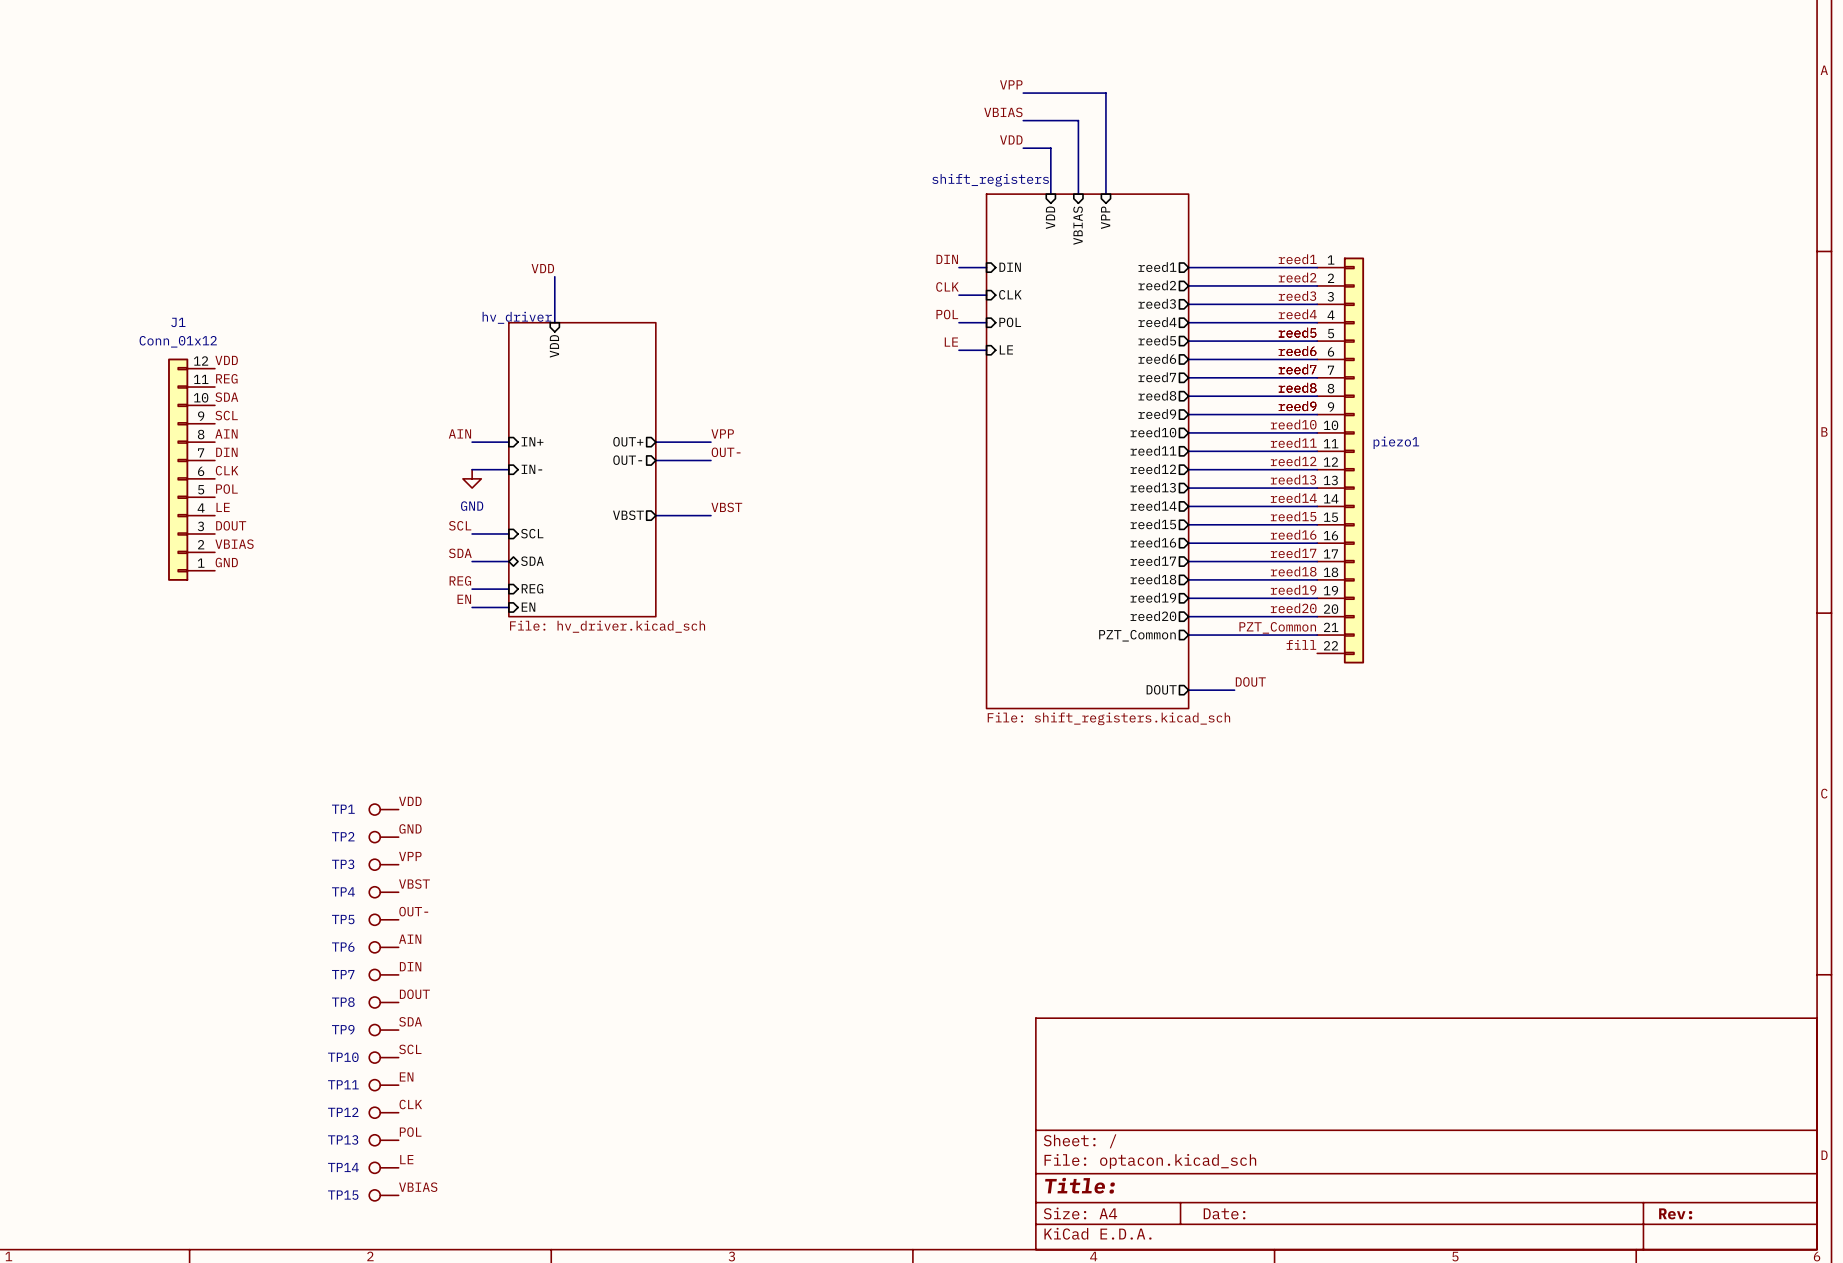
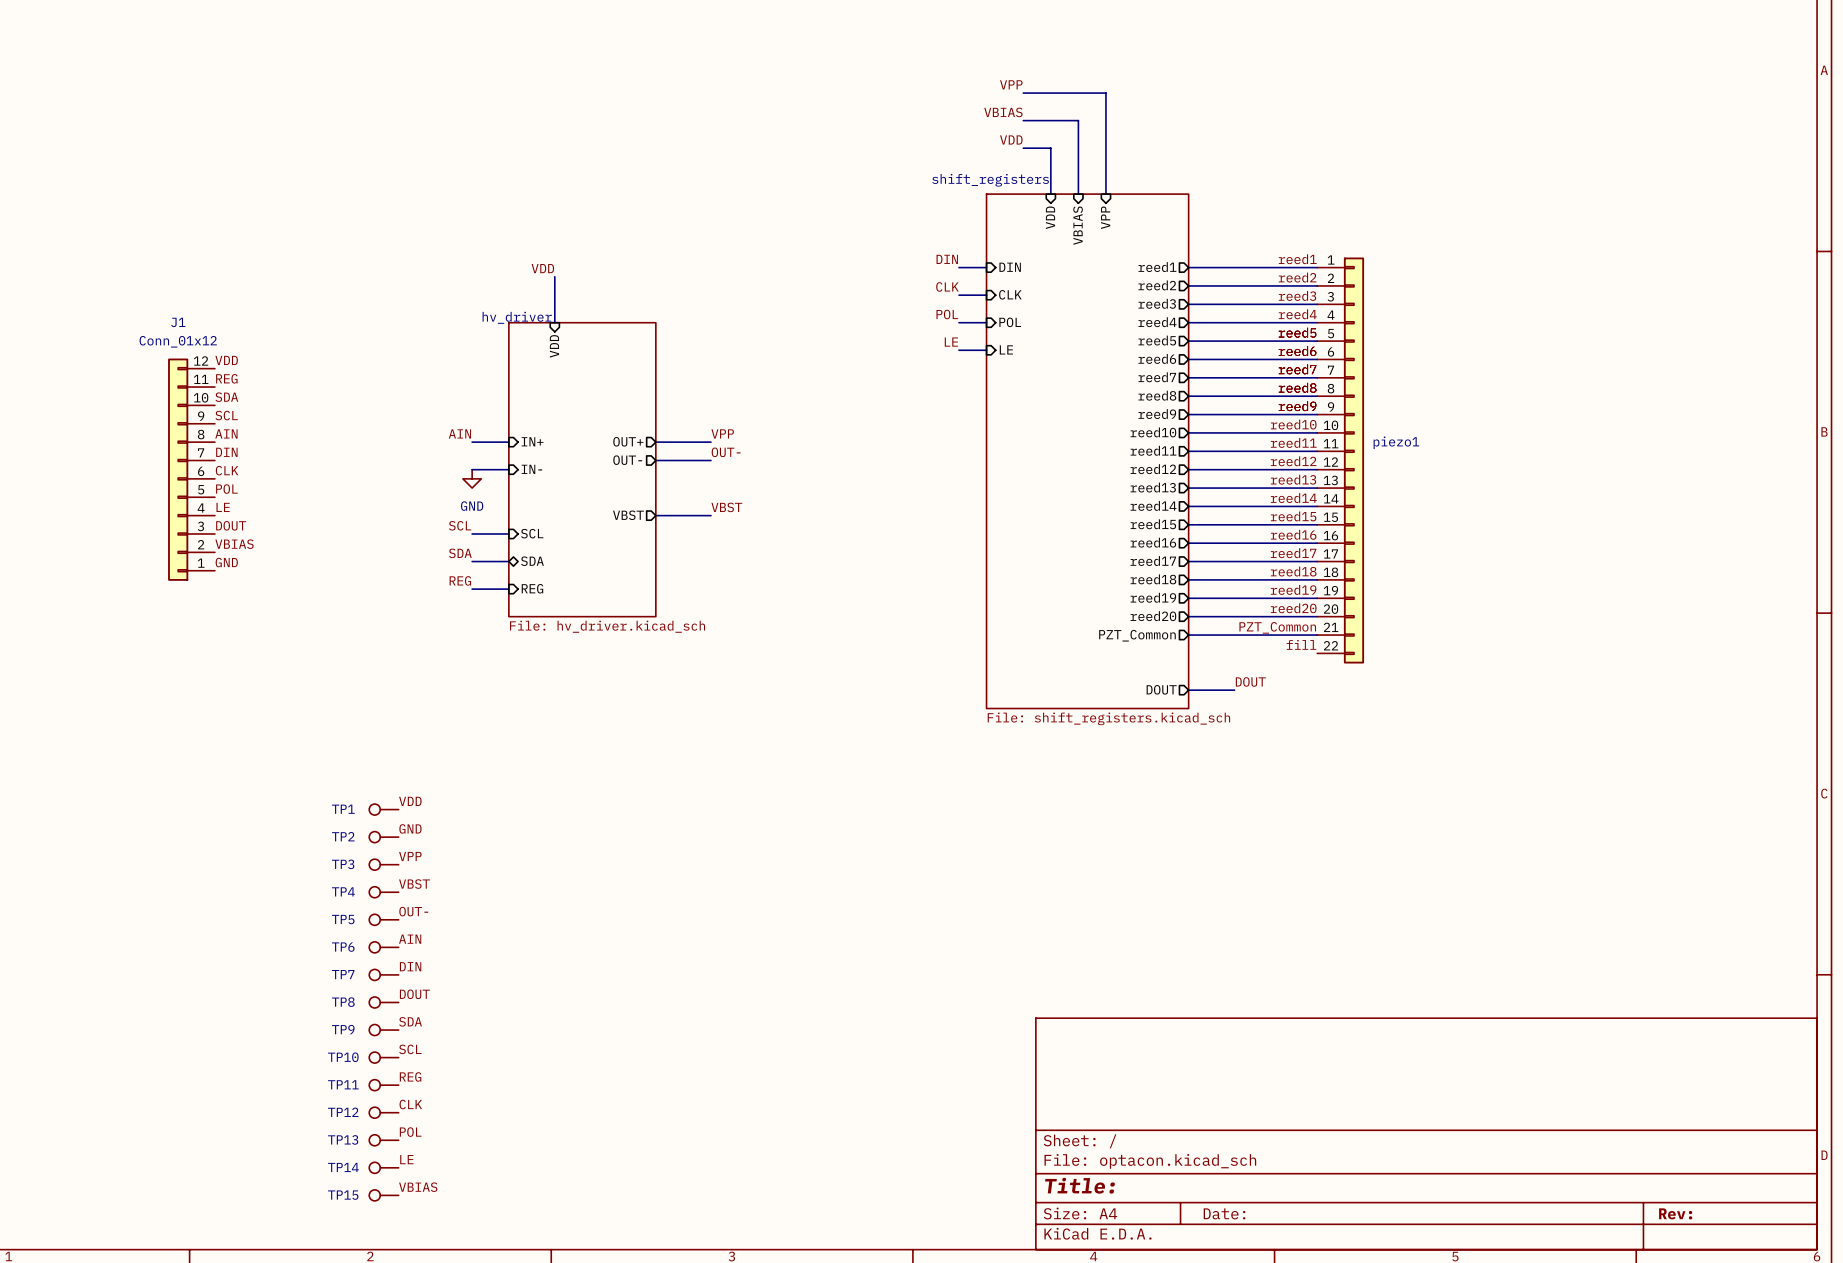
label: EN (464, 599) -> none
wire: (472, 607) (508, 607) -> none
sheet pin: EN (528, 607) -> none
label: EN (406, 1076) -> REG (410, 1076)

